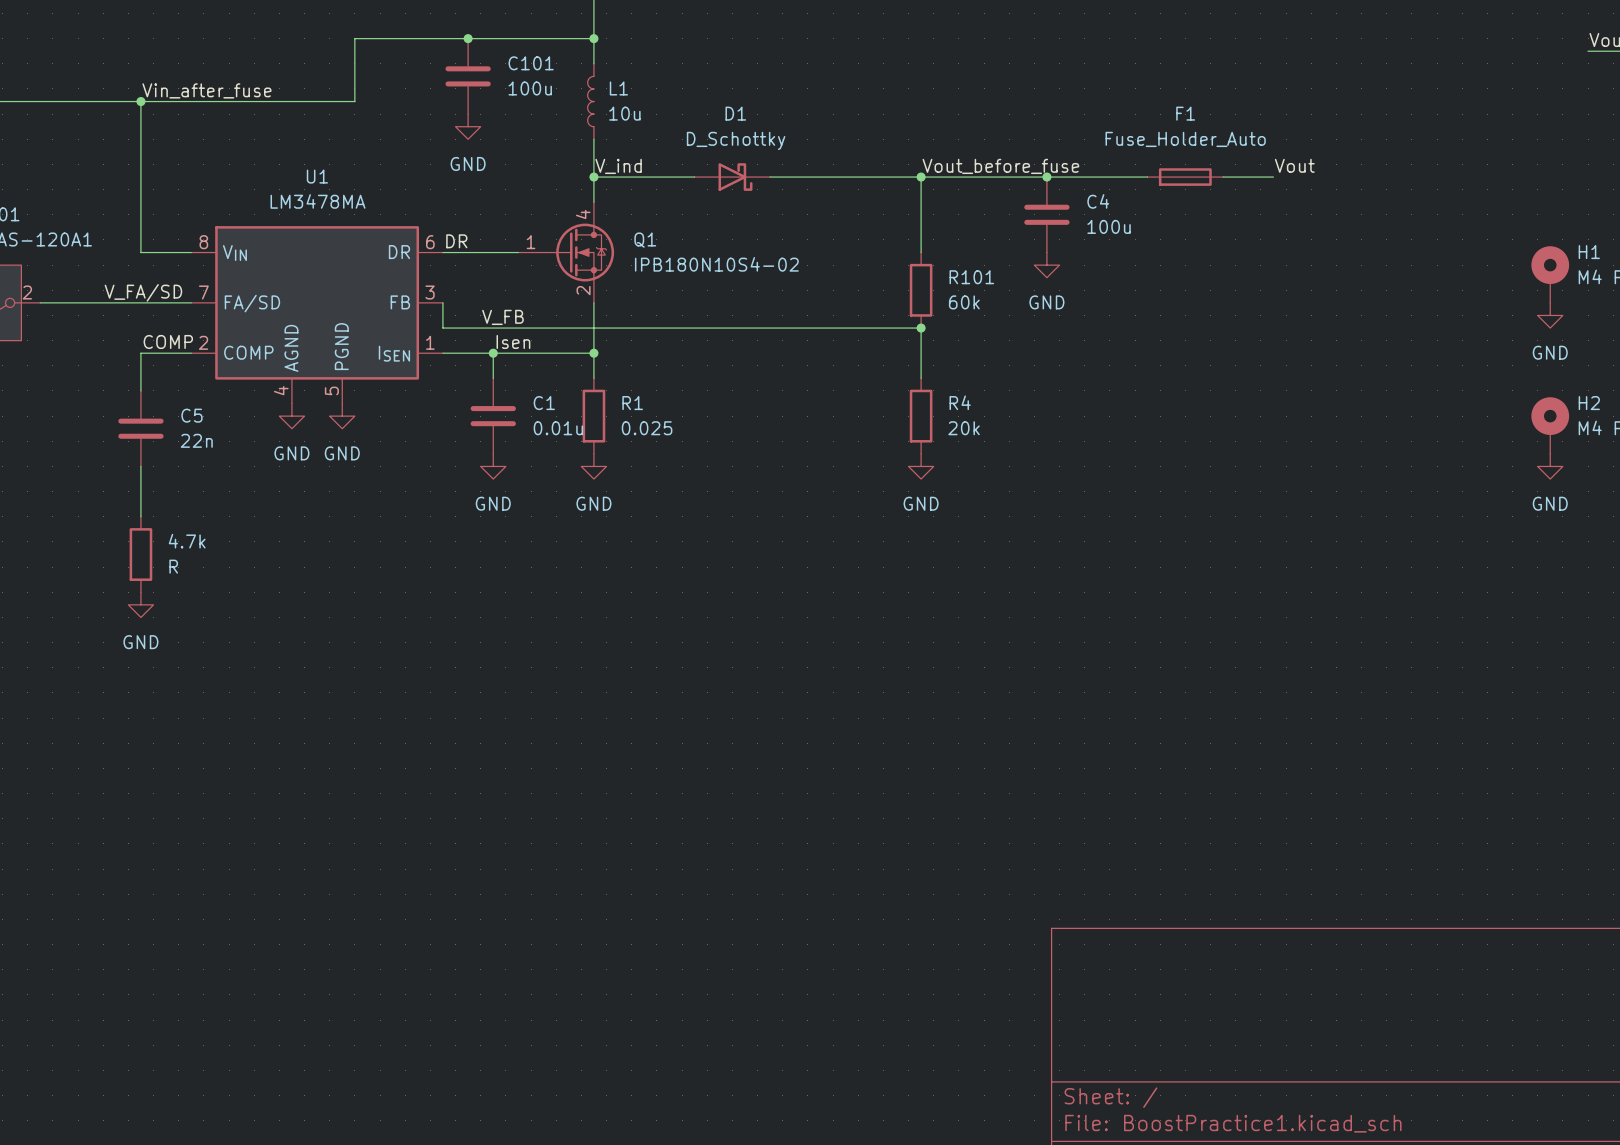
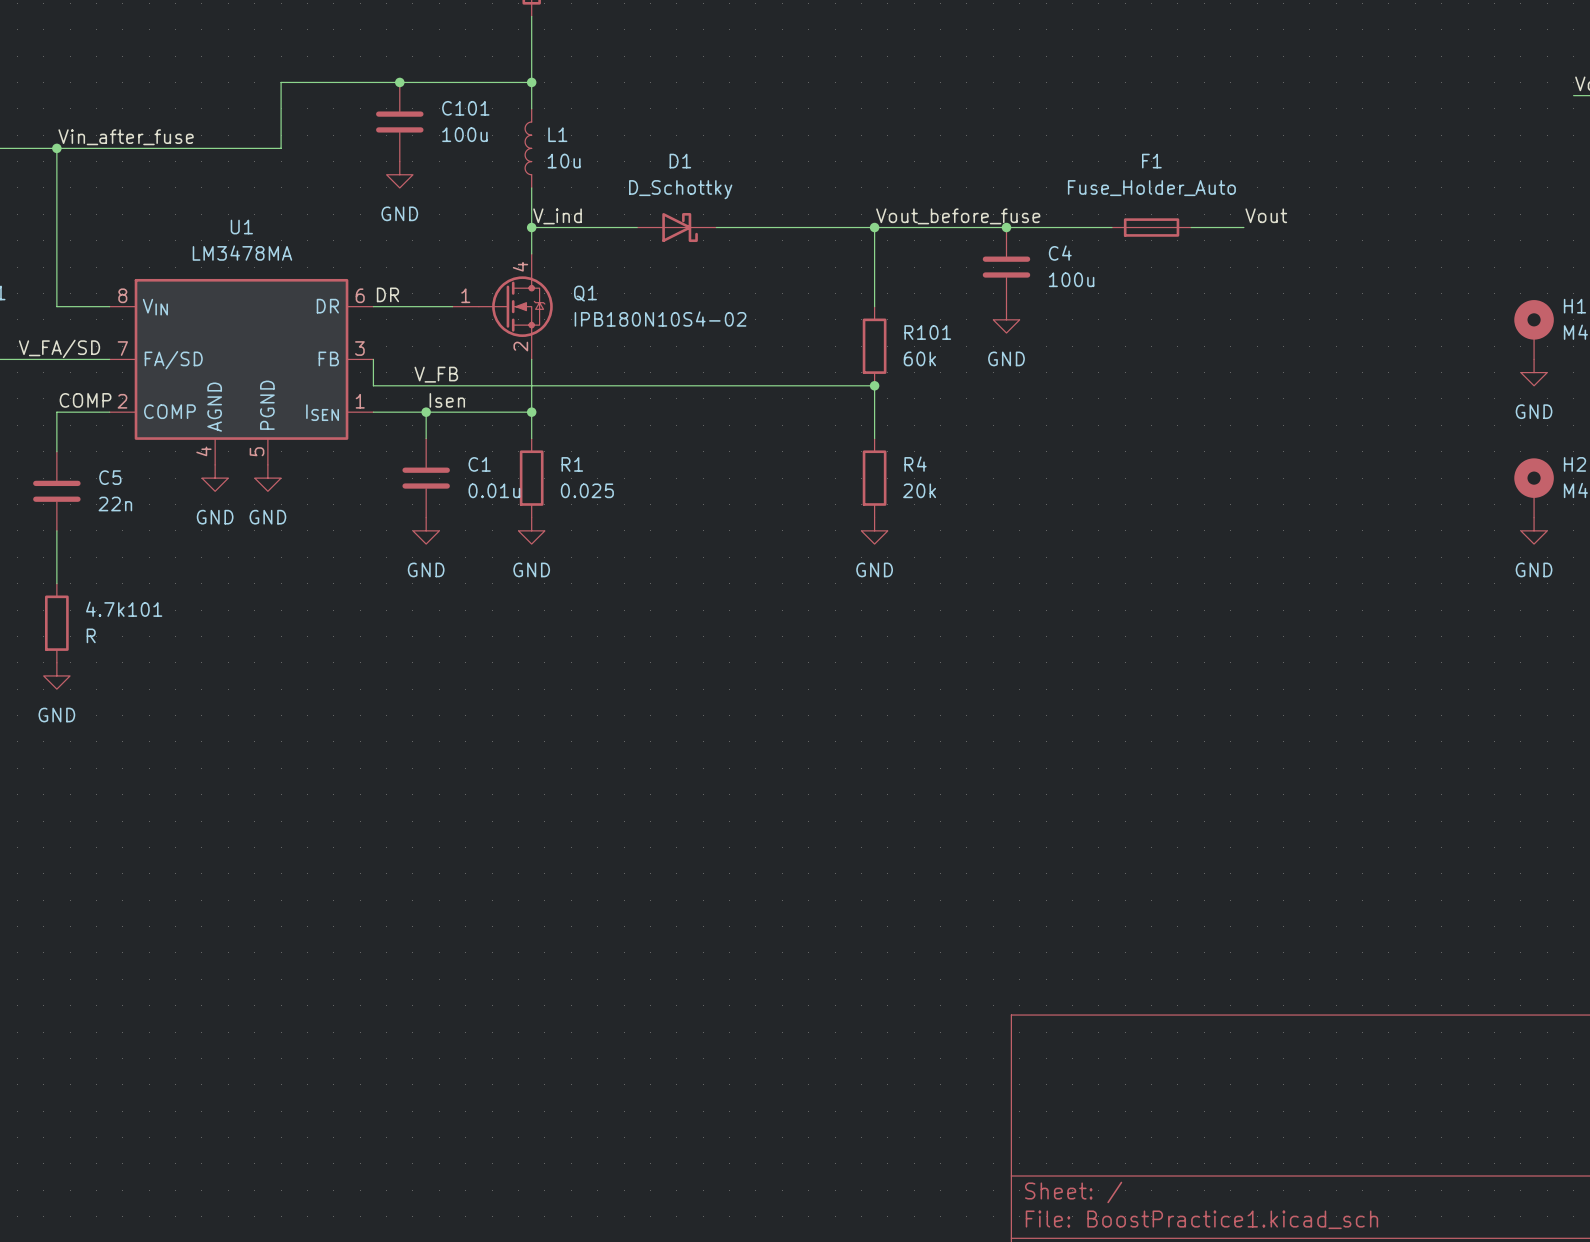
4.7k name: 4.7k (187, 541) -> 4.7k101 (124, 609)

